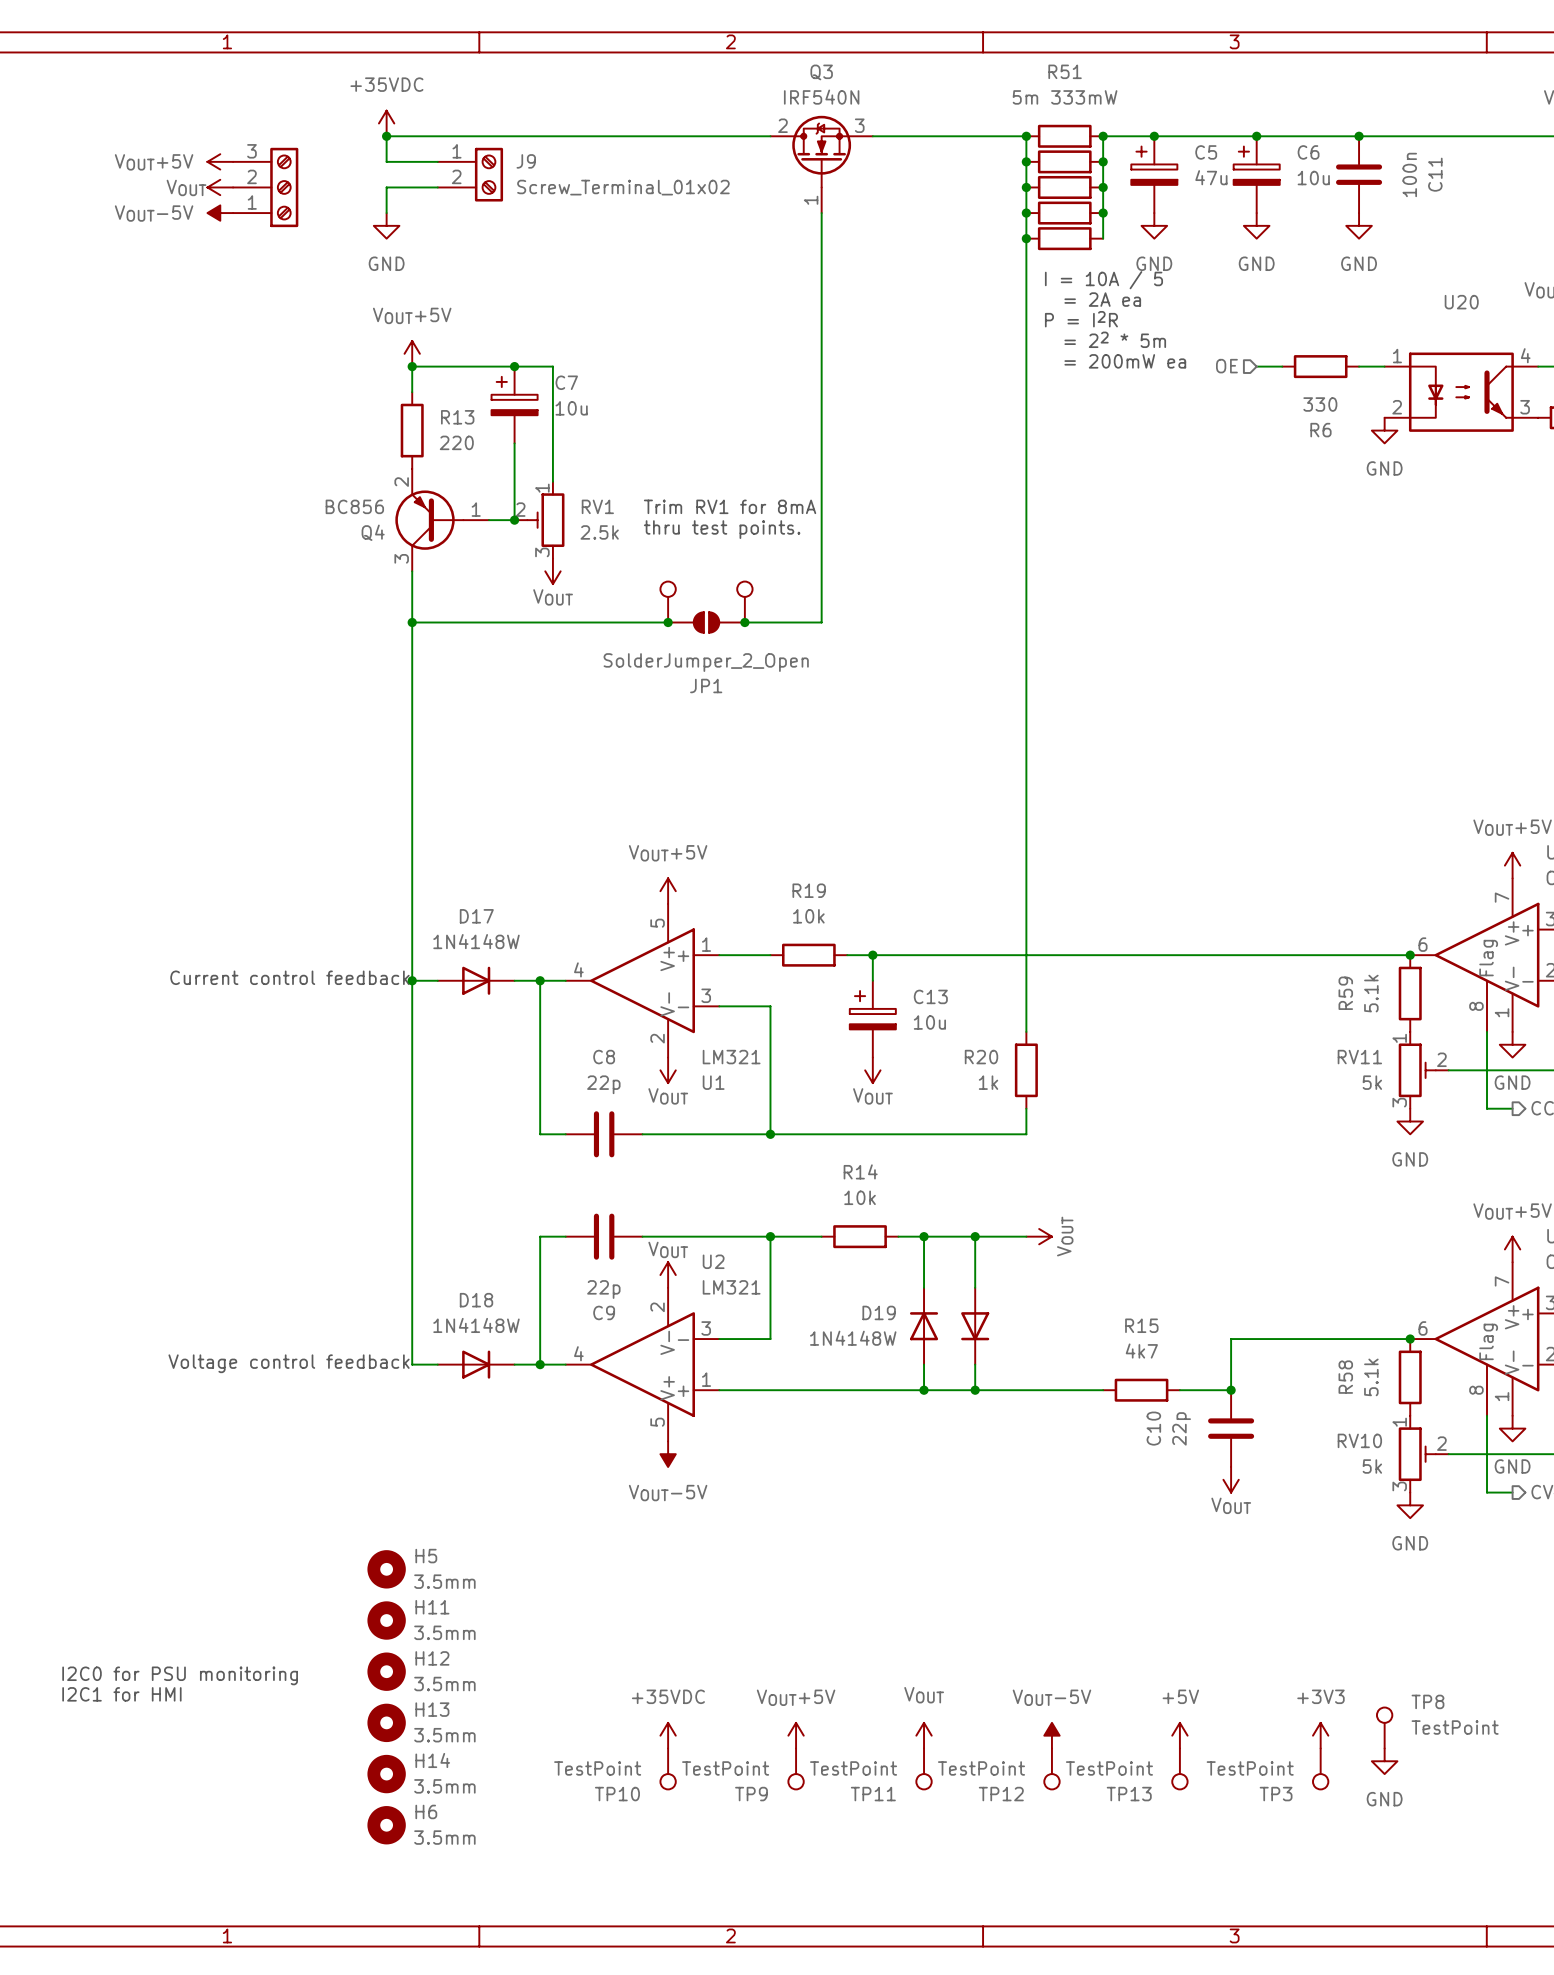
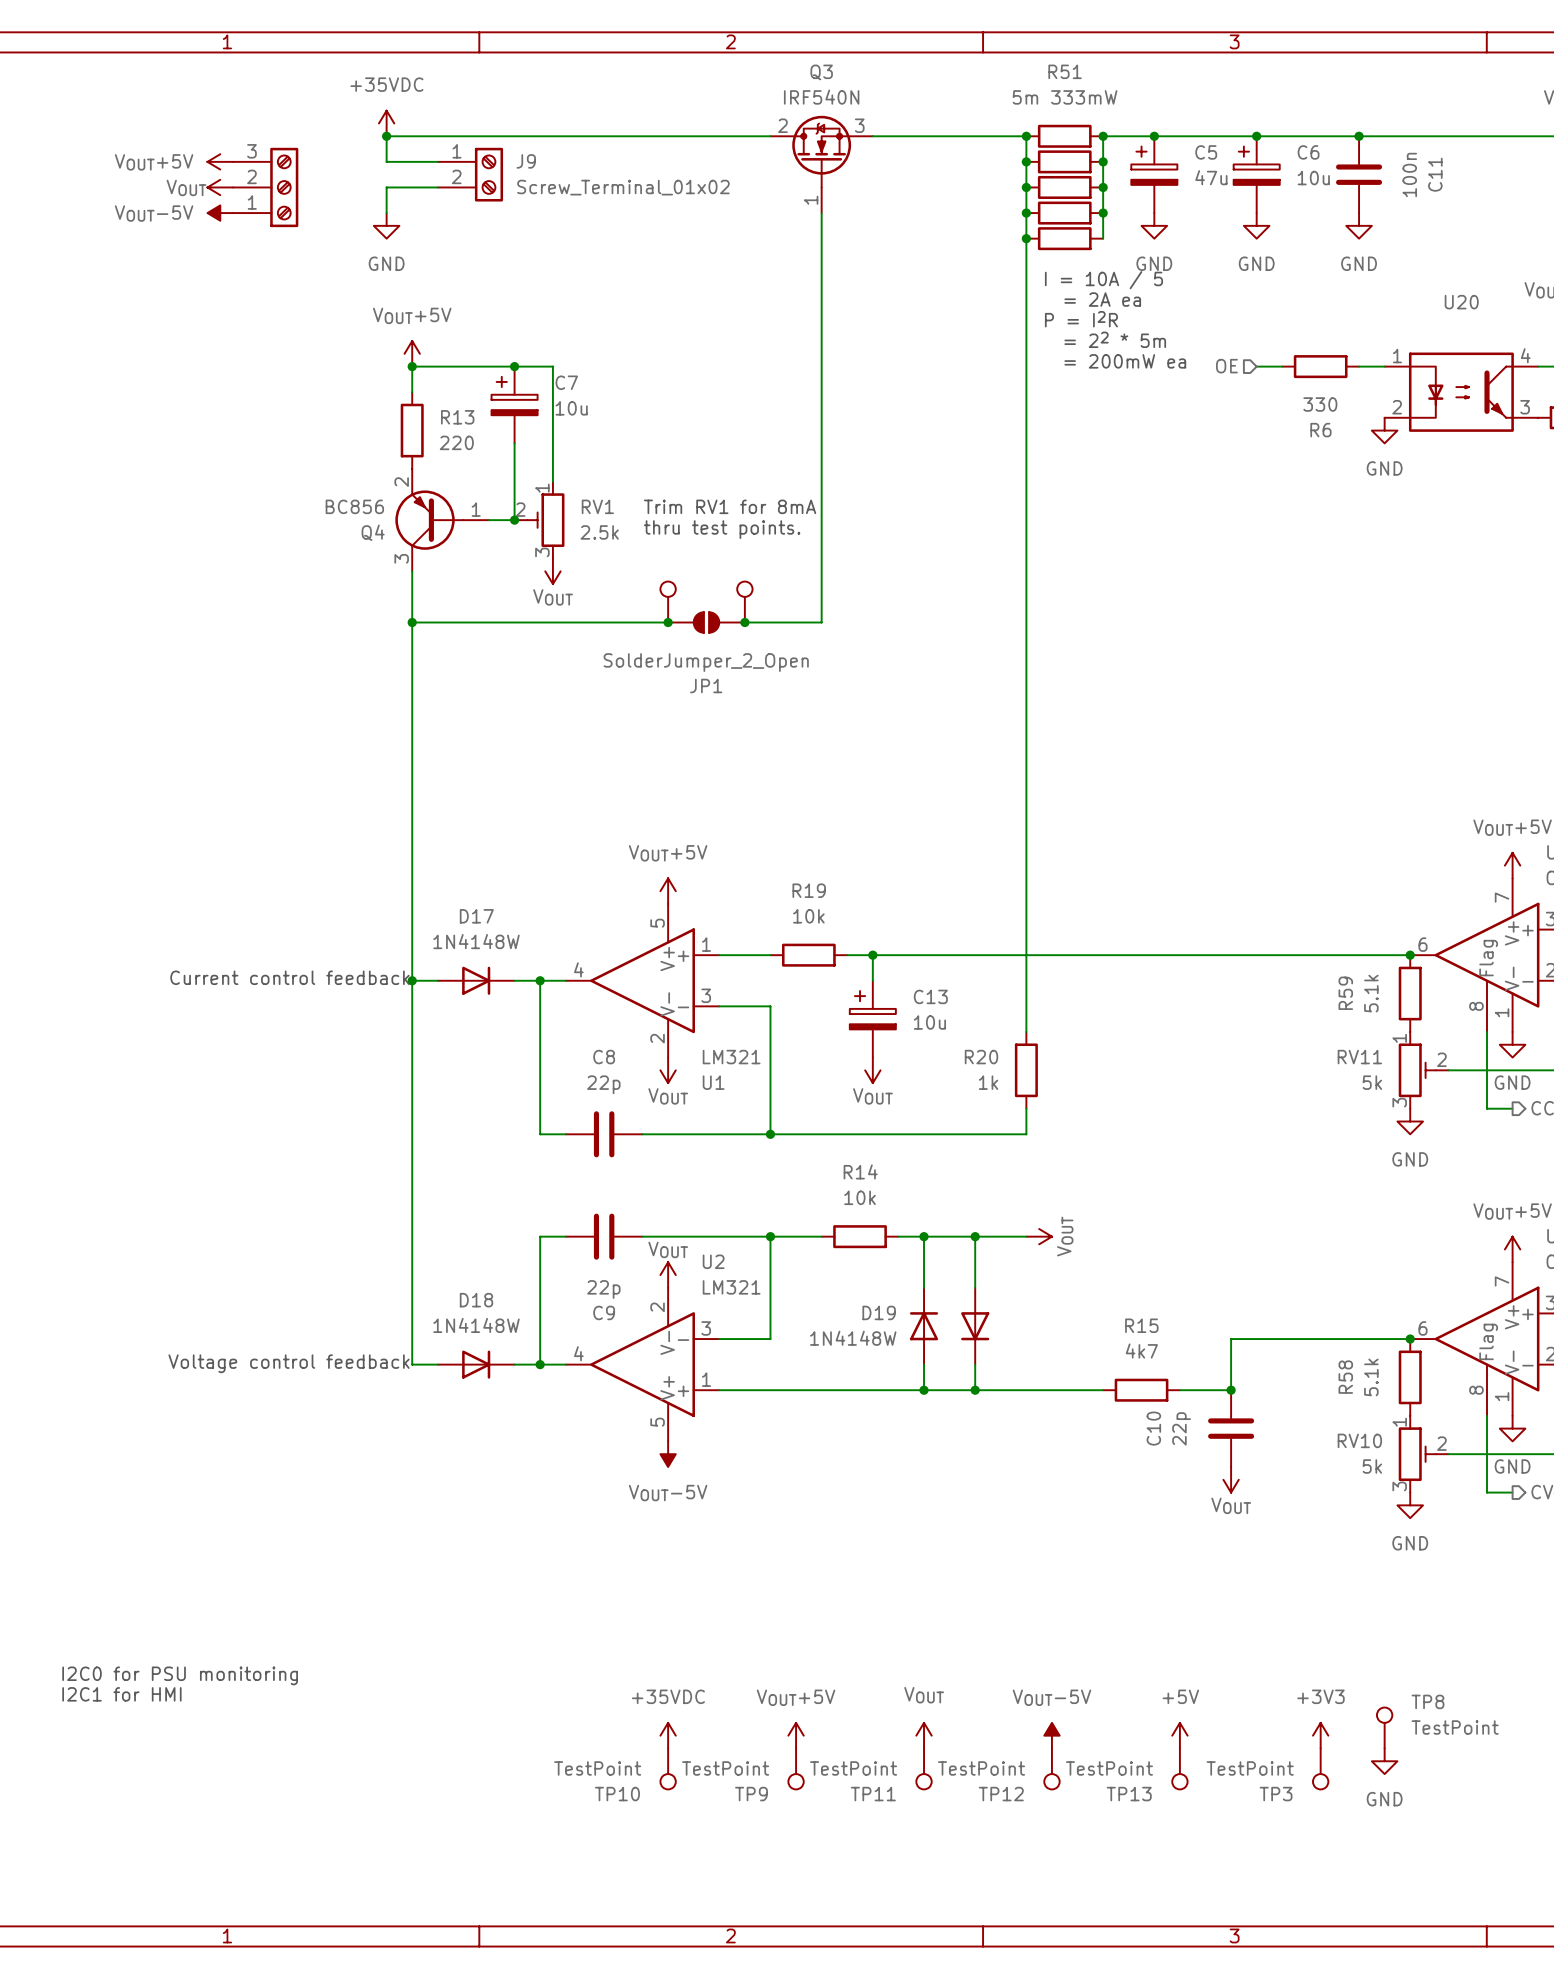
H5: 3.5mm (386, 1569) -> none
H11: 3.5mm (386, 1620) -> none
H12: 3.5mm (386, 1671) -> none
H13: 3.5mm (386, 1722) -> none
H14: 3.5mm (386, 1774) -> none
H6: 3.5mm (386, 1825) -> none

